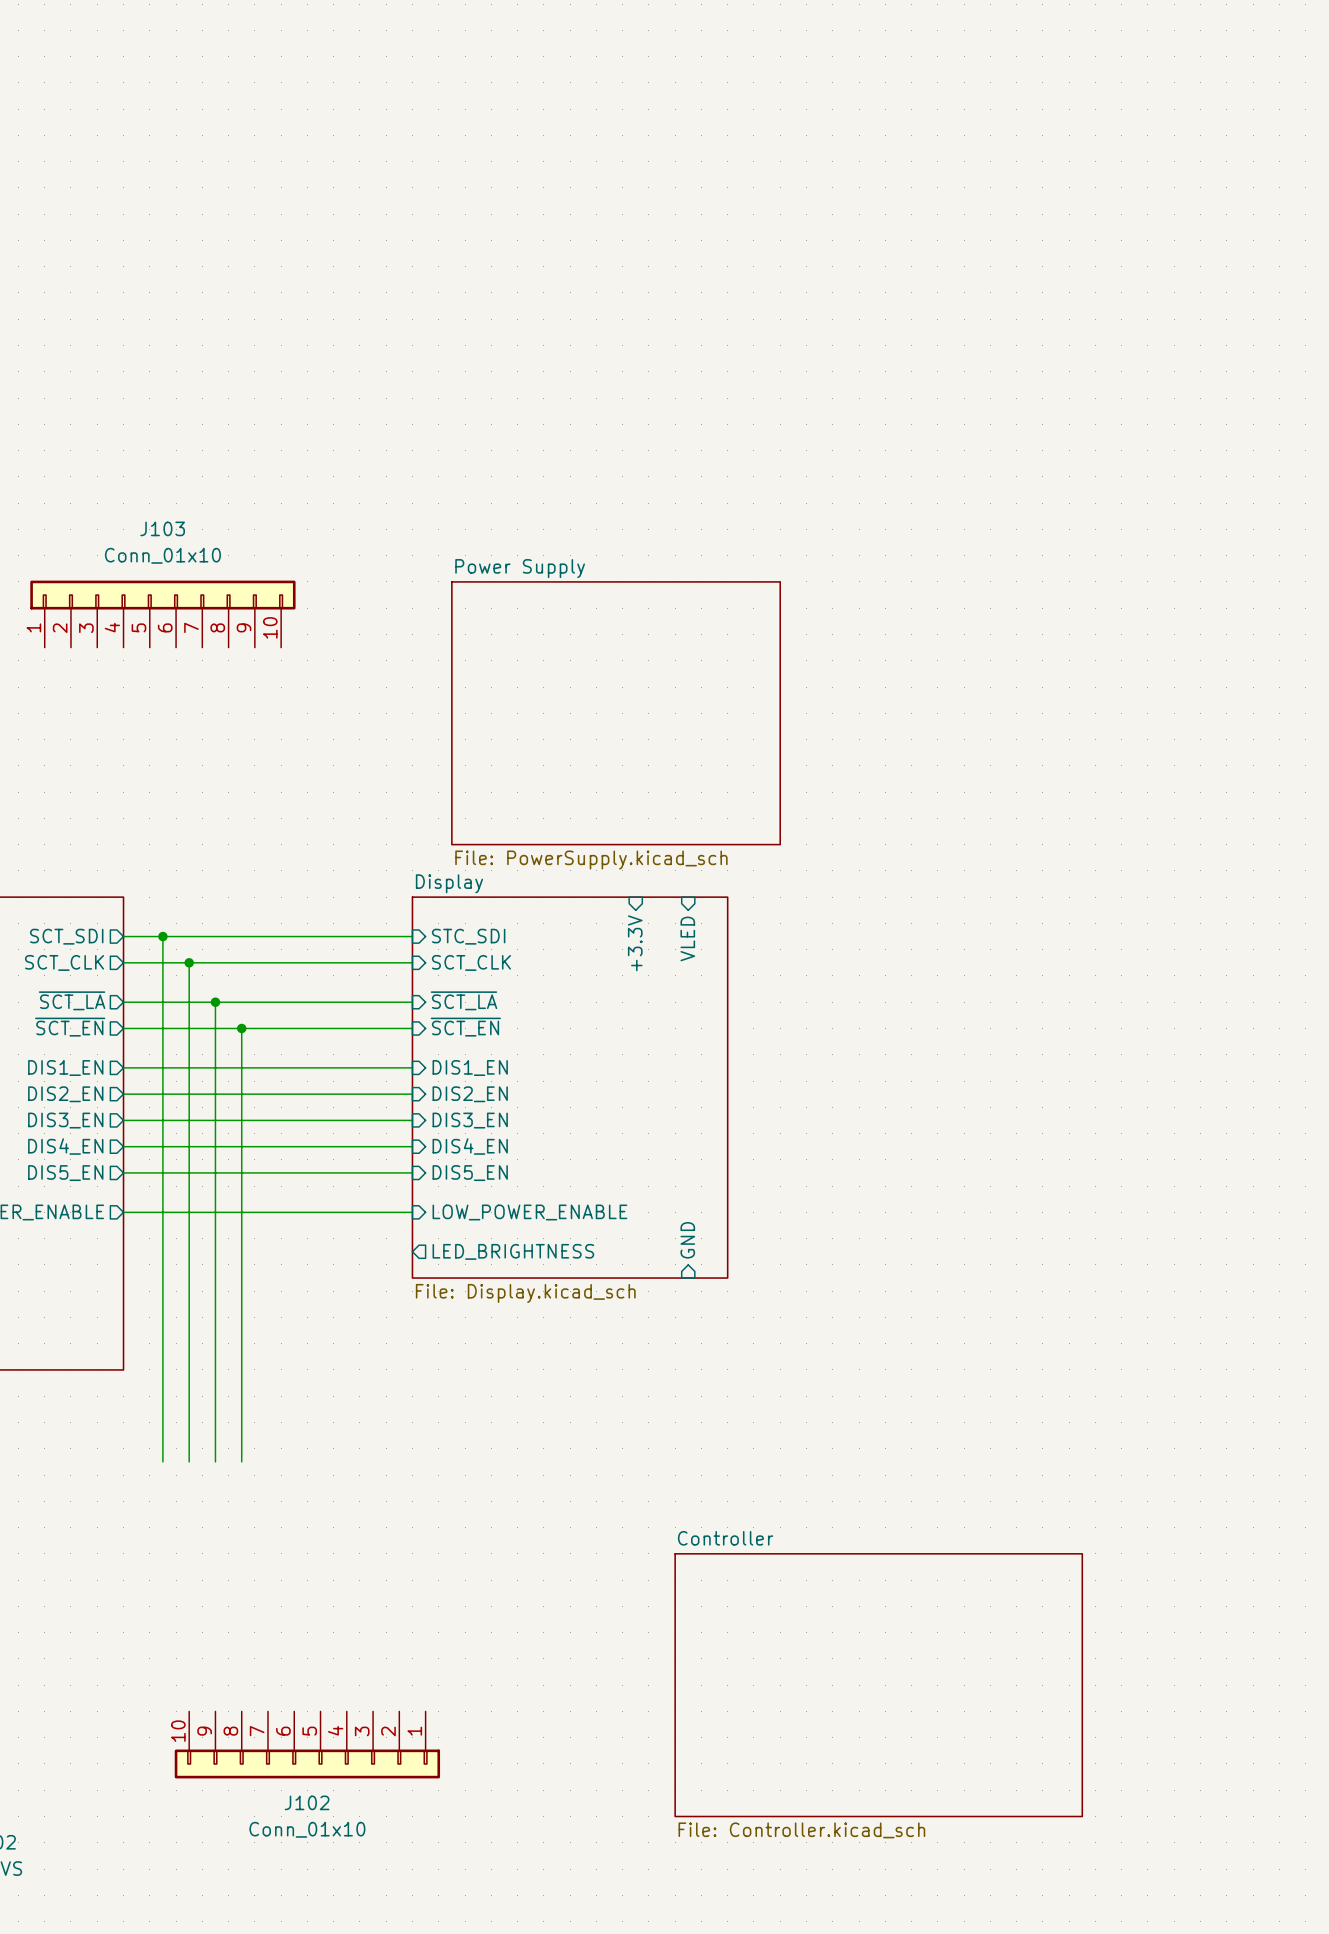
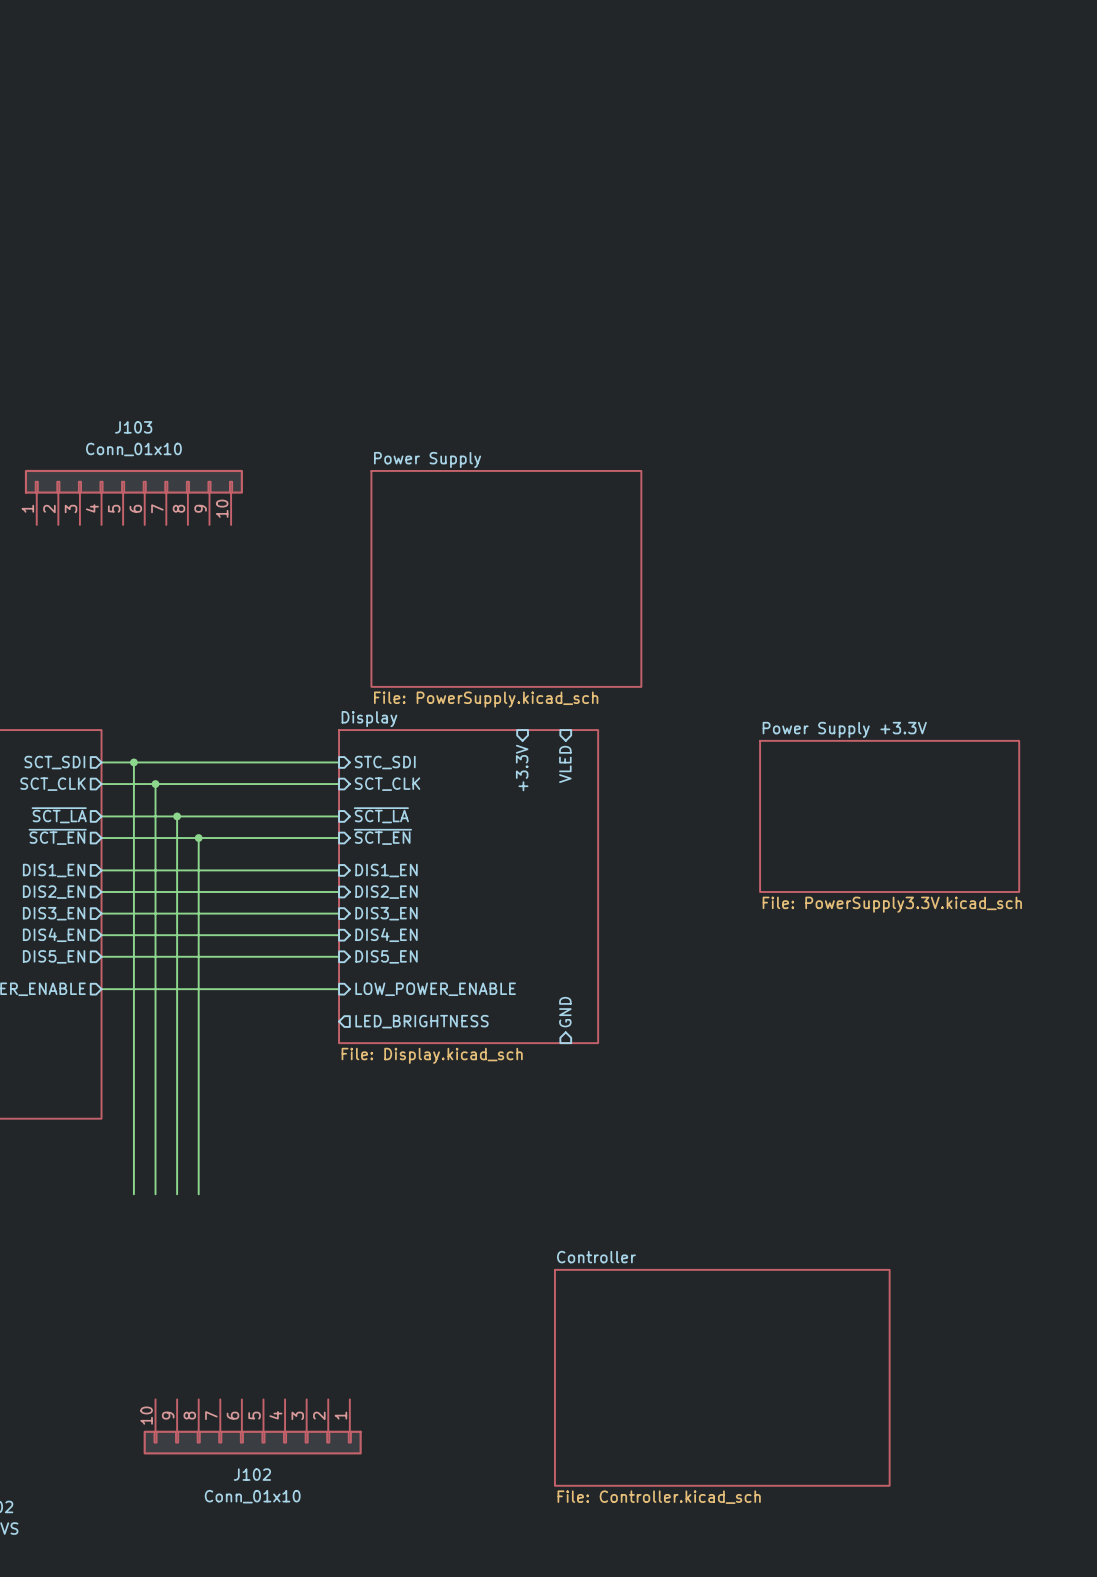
sheet Power Supply +3.3V: none -> File: PowerSupply3.3V.kicad_sch (889, 816)

